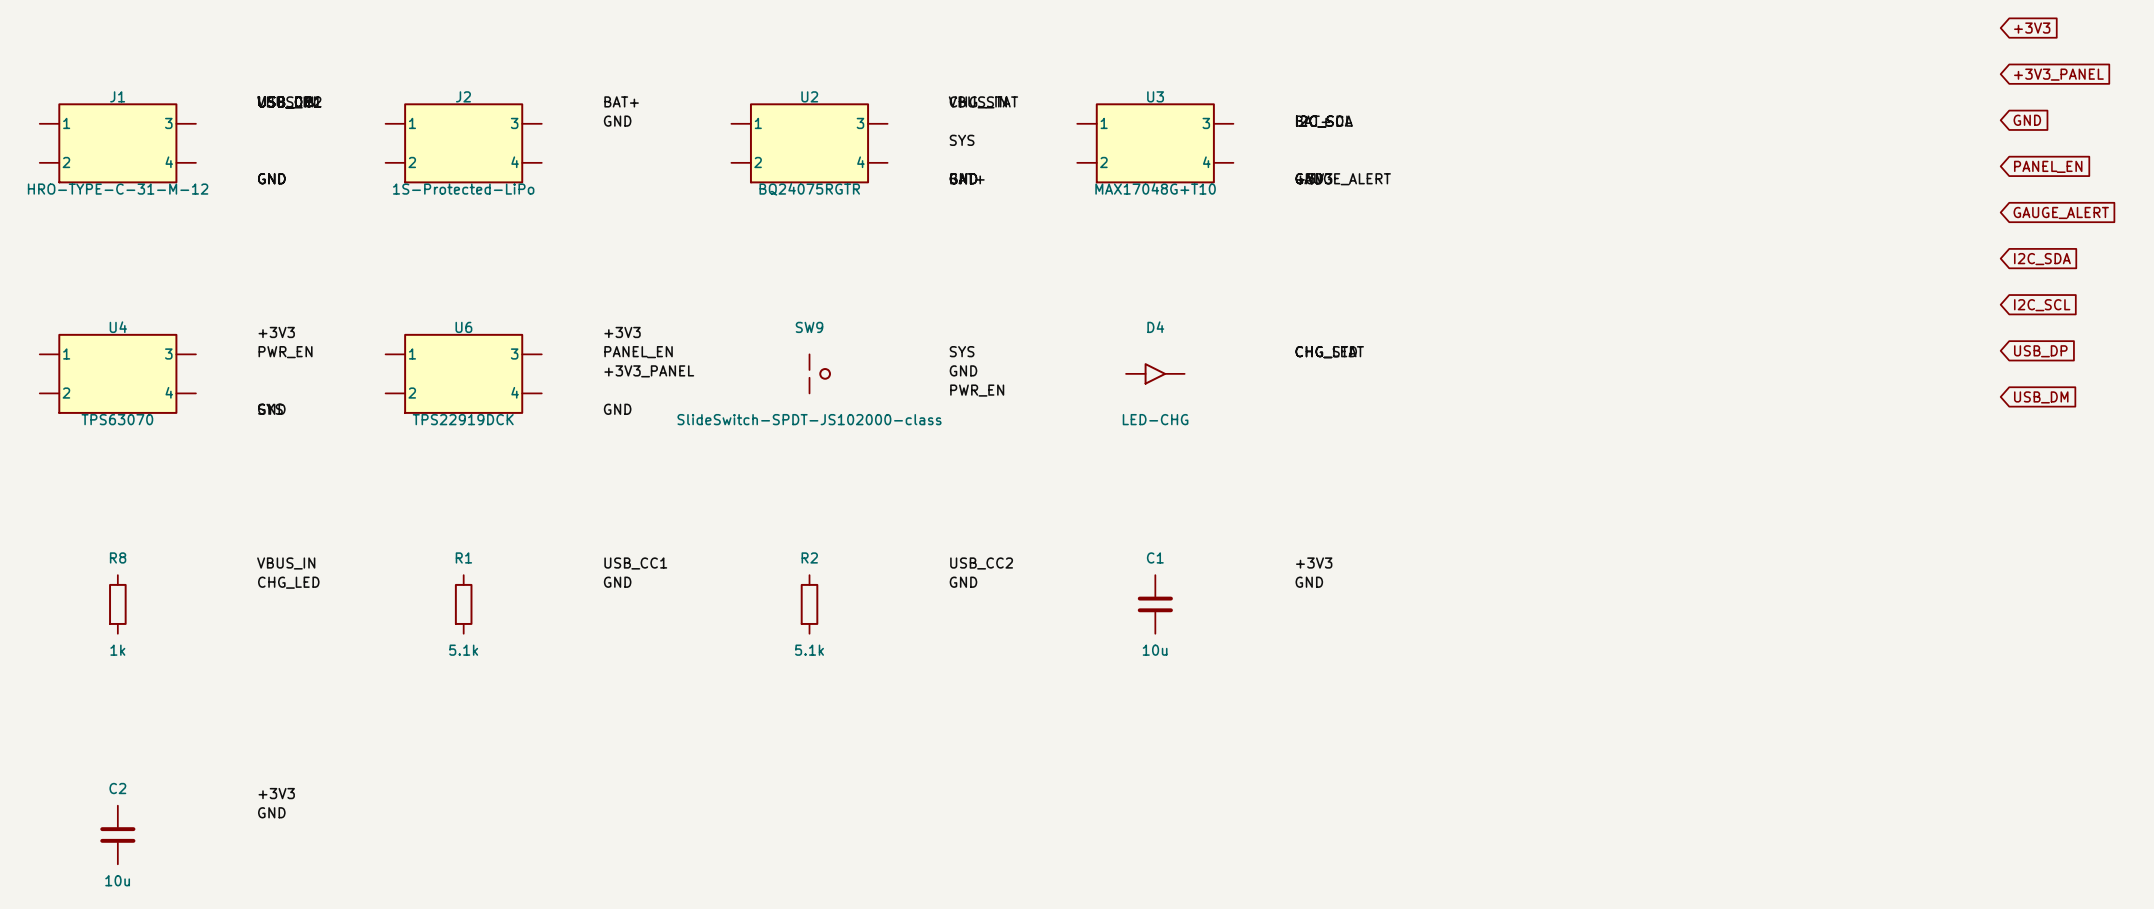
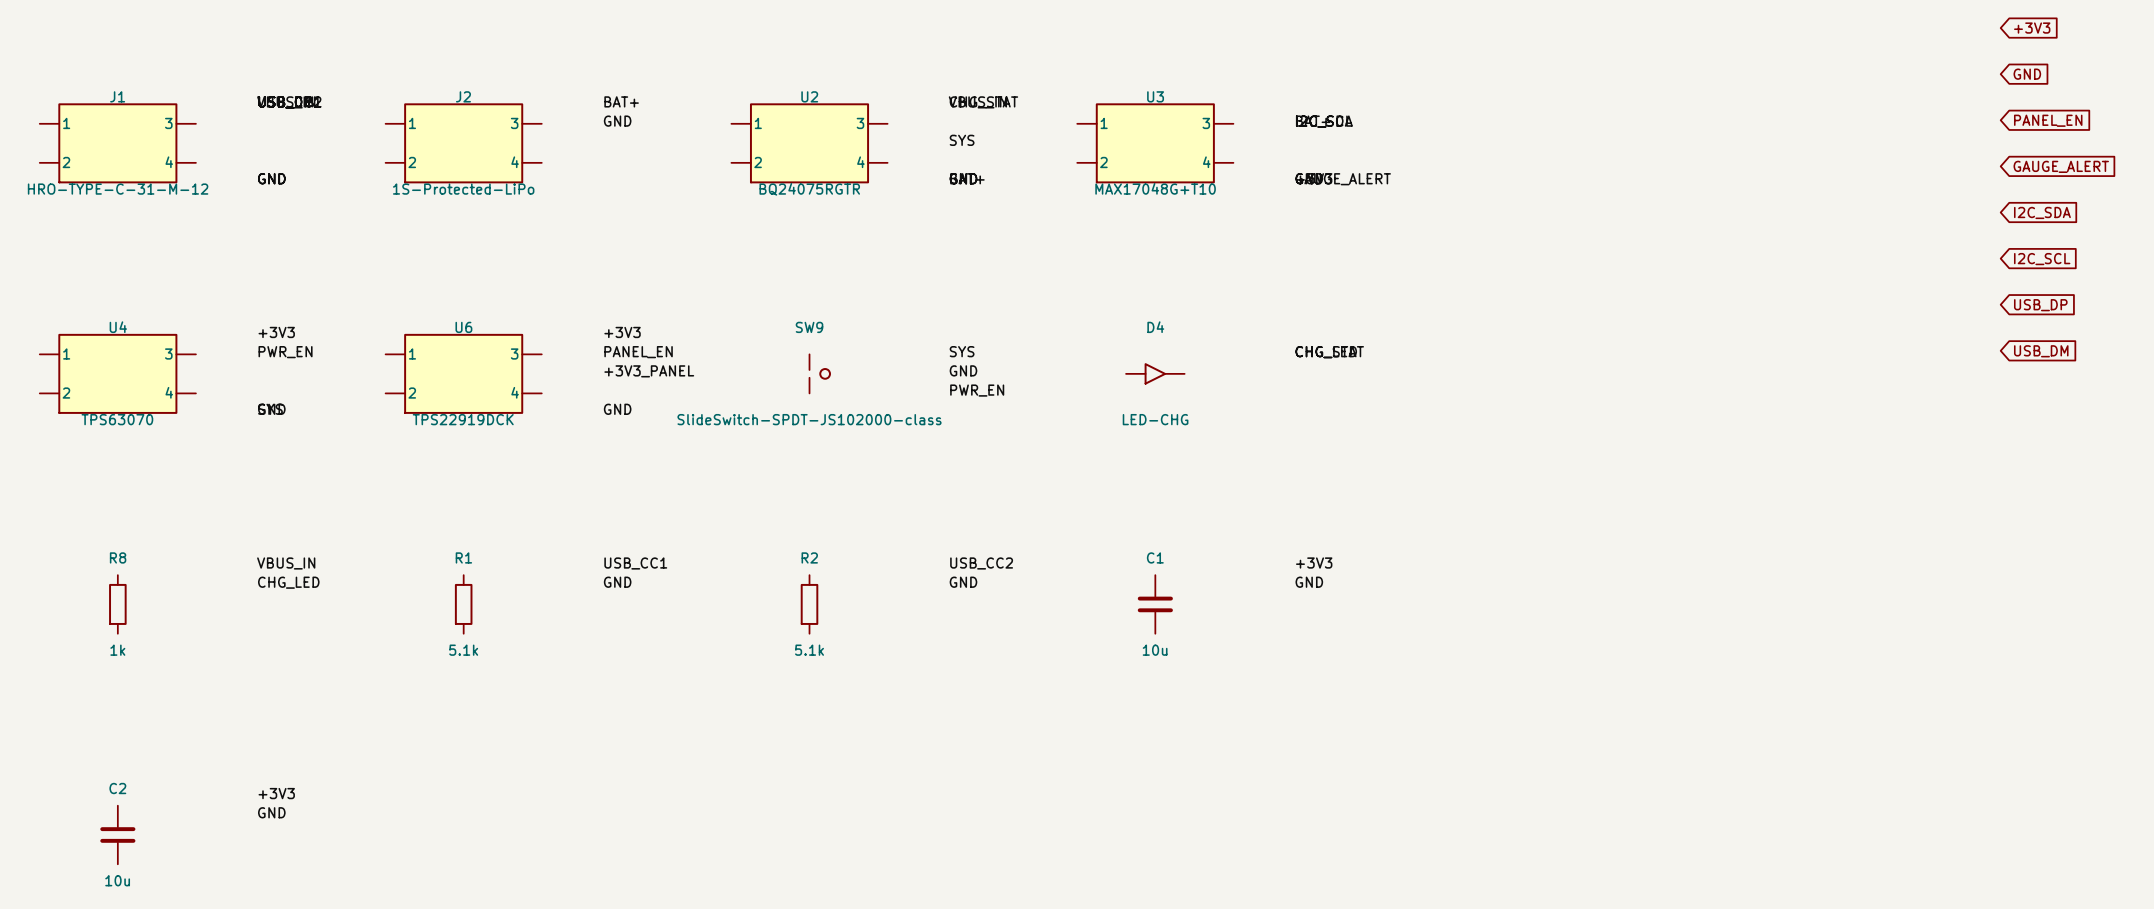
global label: +3V3_PANEL (2058, 74) -> GND (2027, 74)
global label: GND (2027, 120) -> PANEL_EN (2048, 120)
global label: PANEL_EN (2048, 166) -> GAUGE_ALERT (2061, 166)
global label: GAUGE_ALERT (2061, 212) -> I2C_SDA (2042, 212)
global label: I2C_SDA (2042, 259) -> I2C_SCL (2042, 259)
global label: I2C_SCL (2042, 305) -> USB_DP (2040, 305)
global label: USB_DP (2040, 351) -> USB_DM (2041, 351)
global label: USB_DM (2041, 397) -> none

